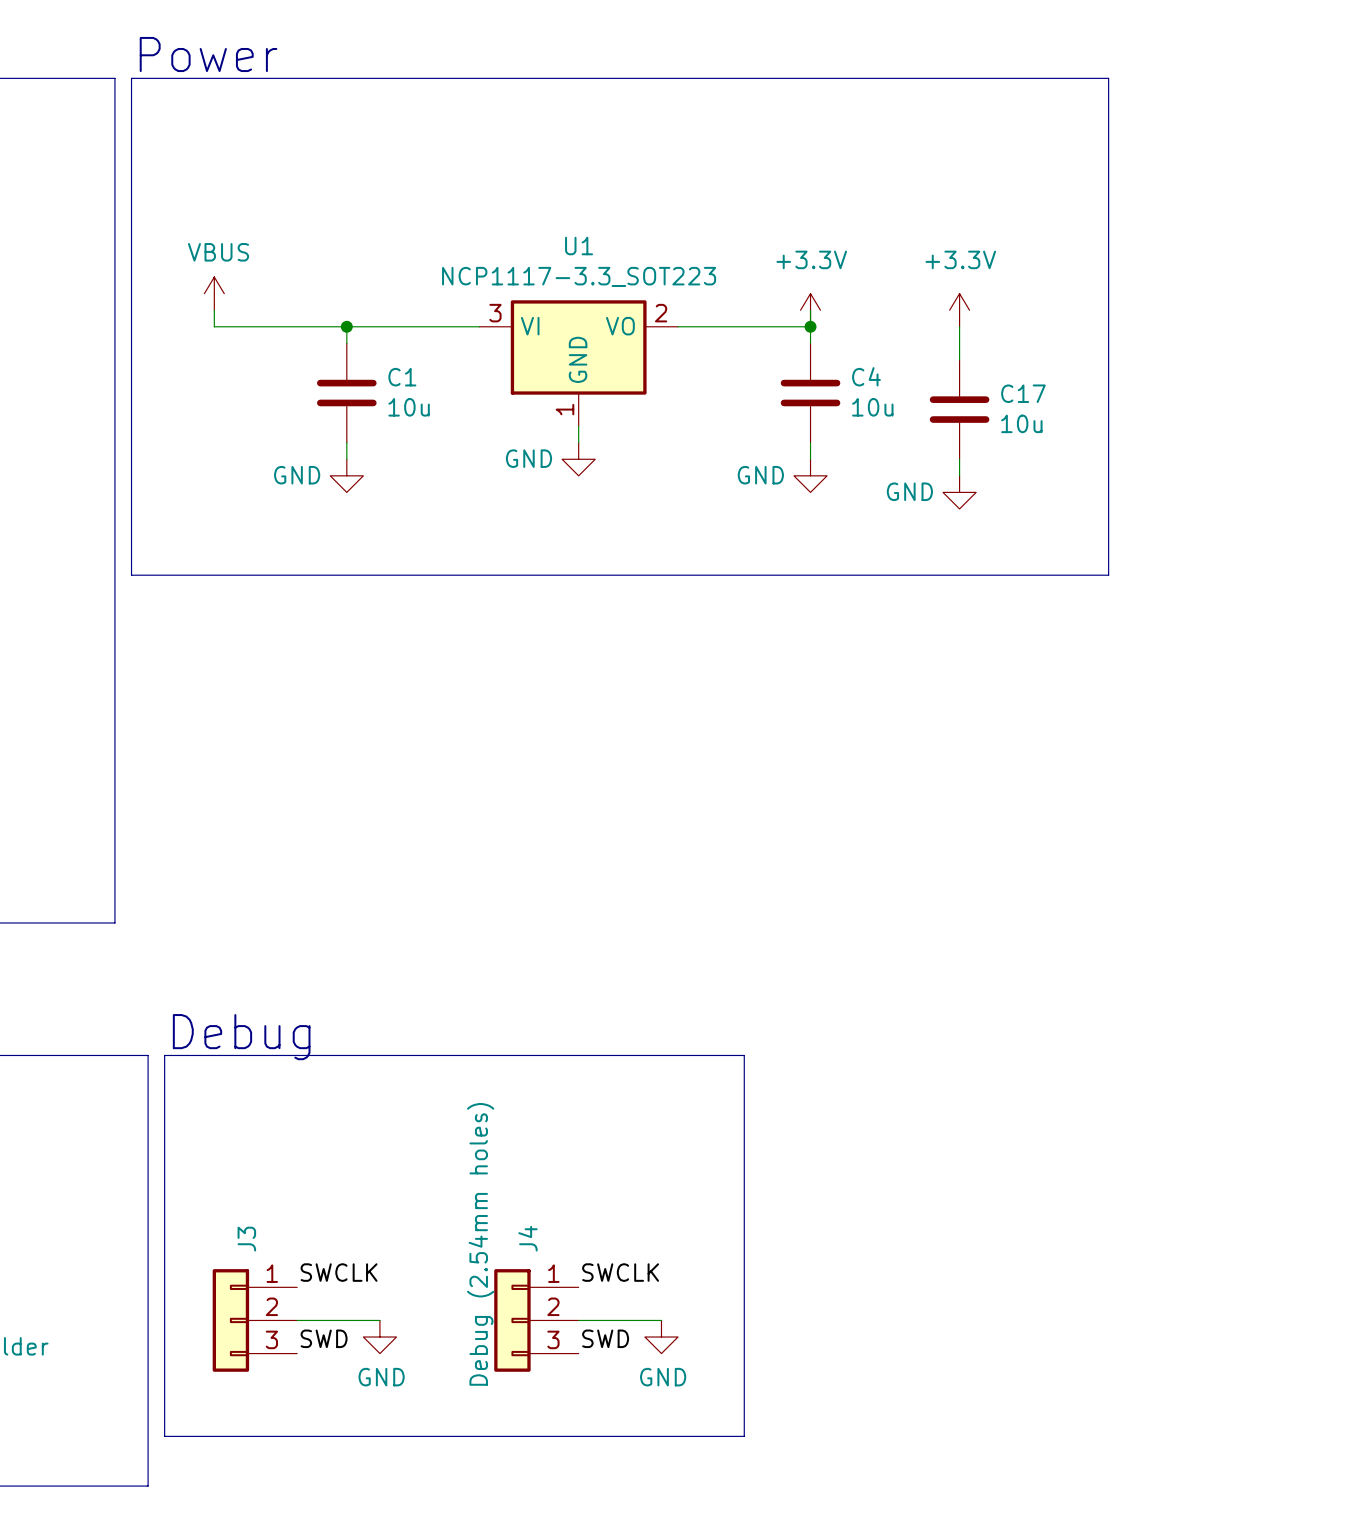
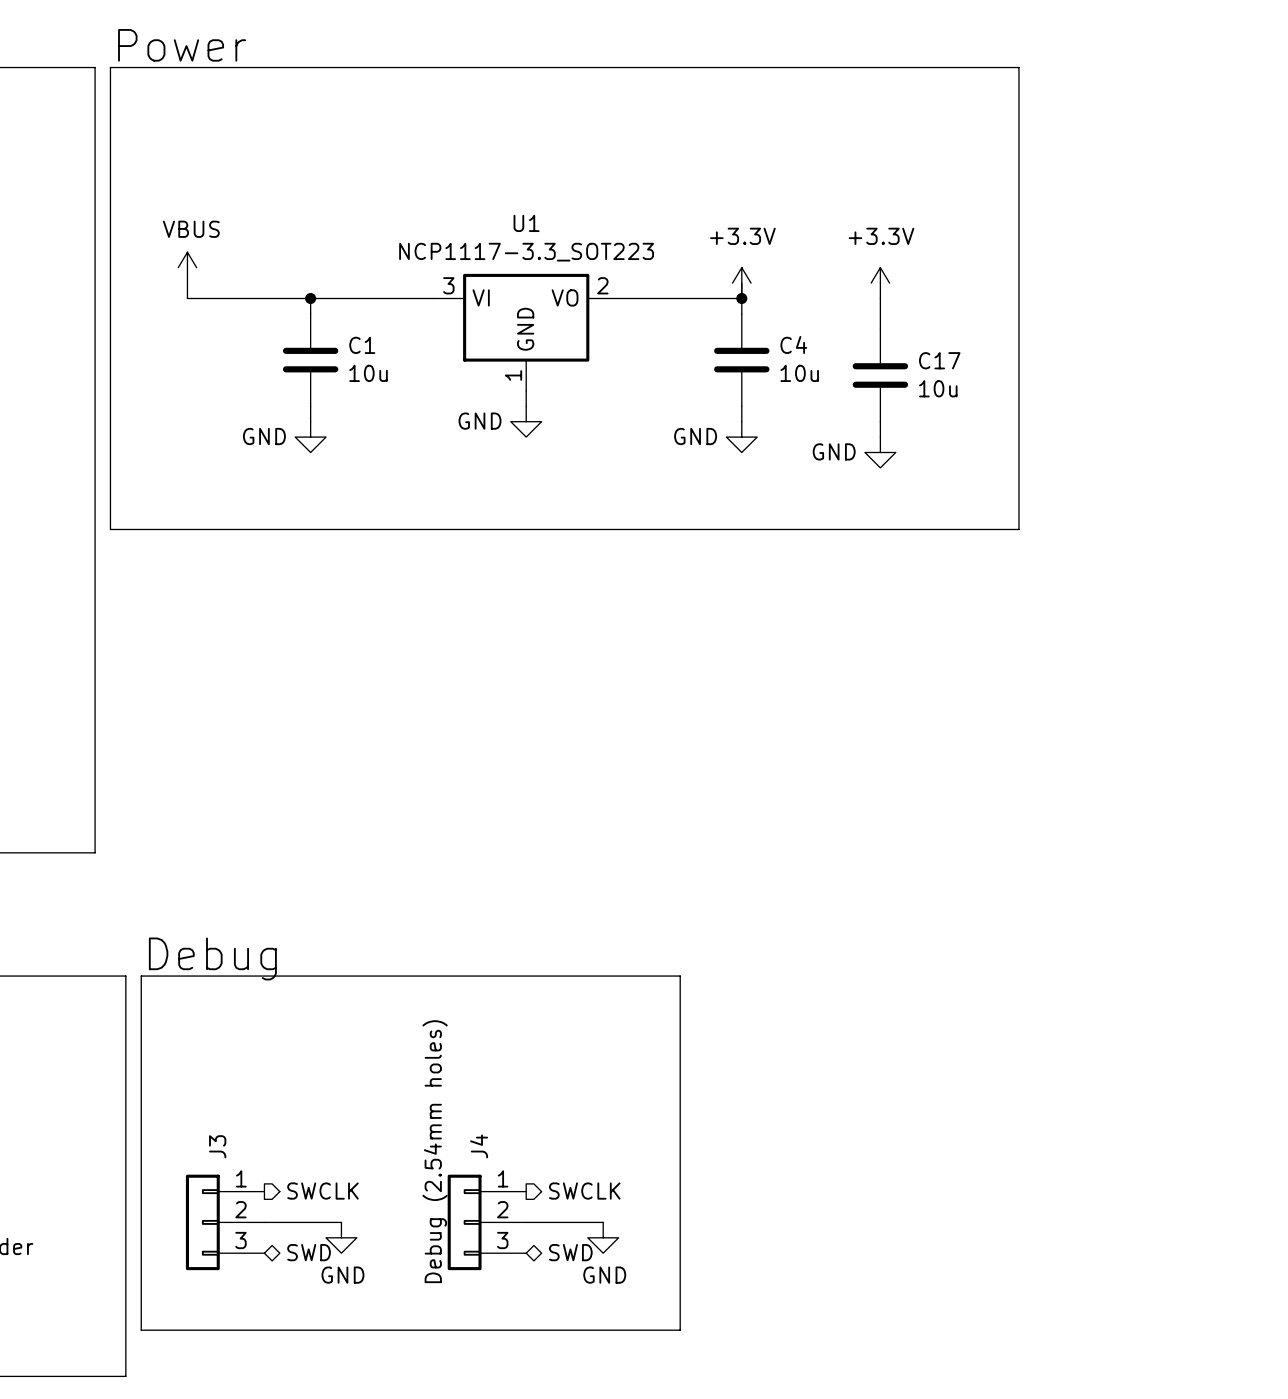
label: SWCLK (339, 1272) -> none
label: SWCLK (620, 1272) -> none
hierarchical label: none -> SWCLK (322, 1191)
hierarchical label: none -> SWCLK (584, 1191)
label: SWD (324, 1338) -> none
label: SWD (605, 1338) -> none
hierarchical label: none -> SWD (309, 1252)
hierarchical label: none -> SWD (570, 1252)

